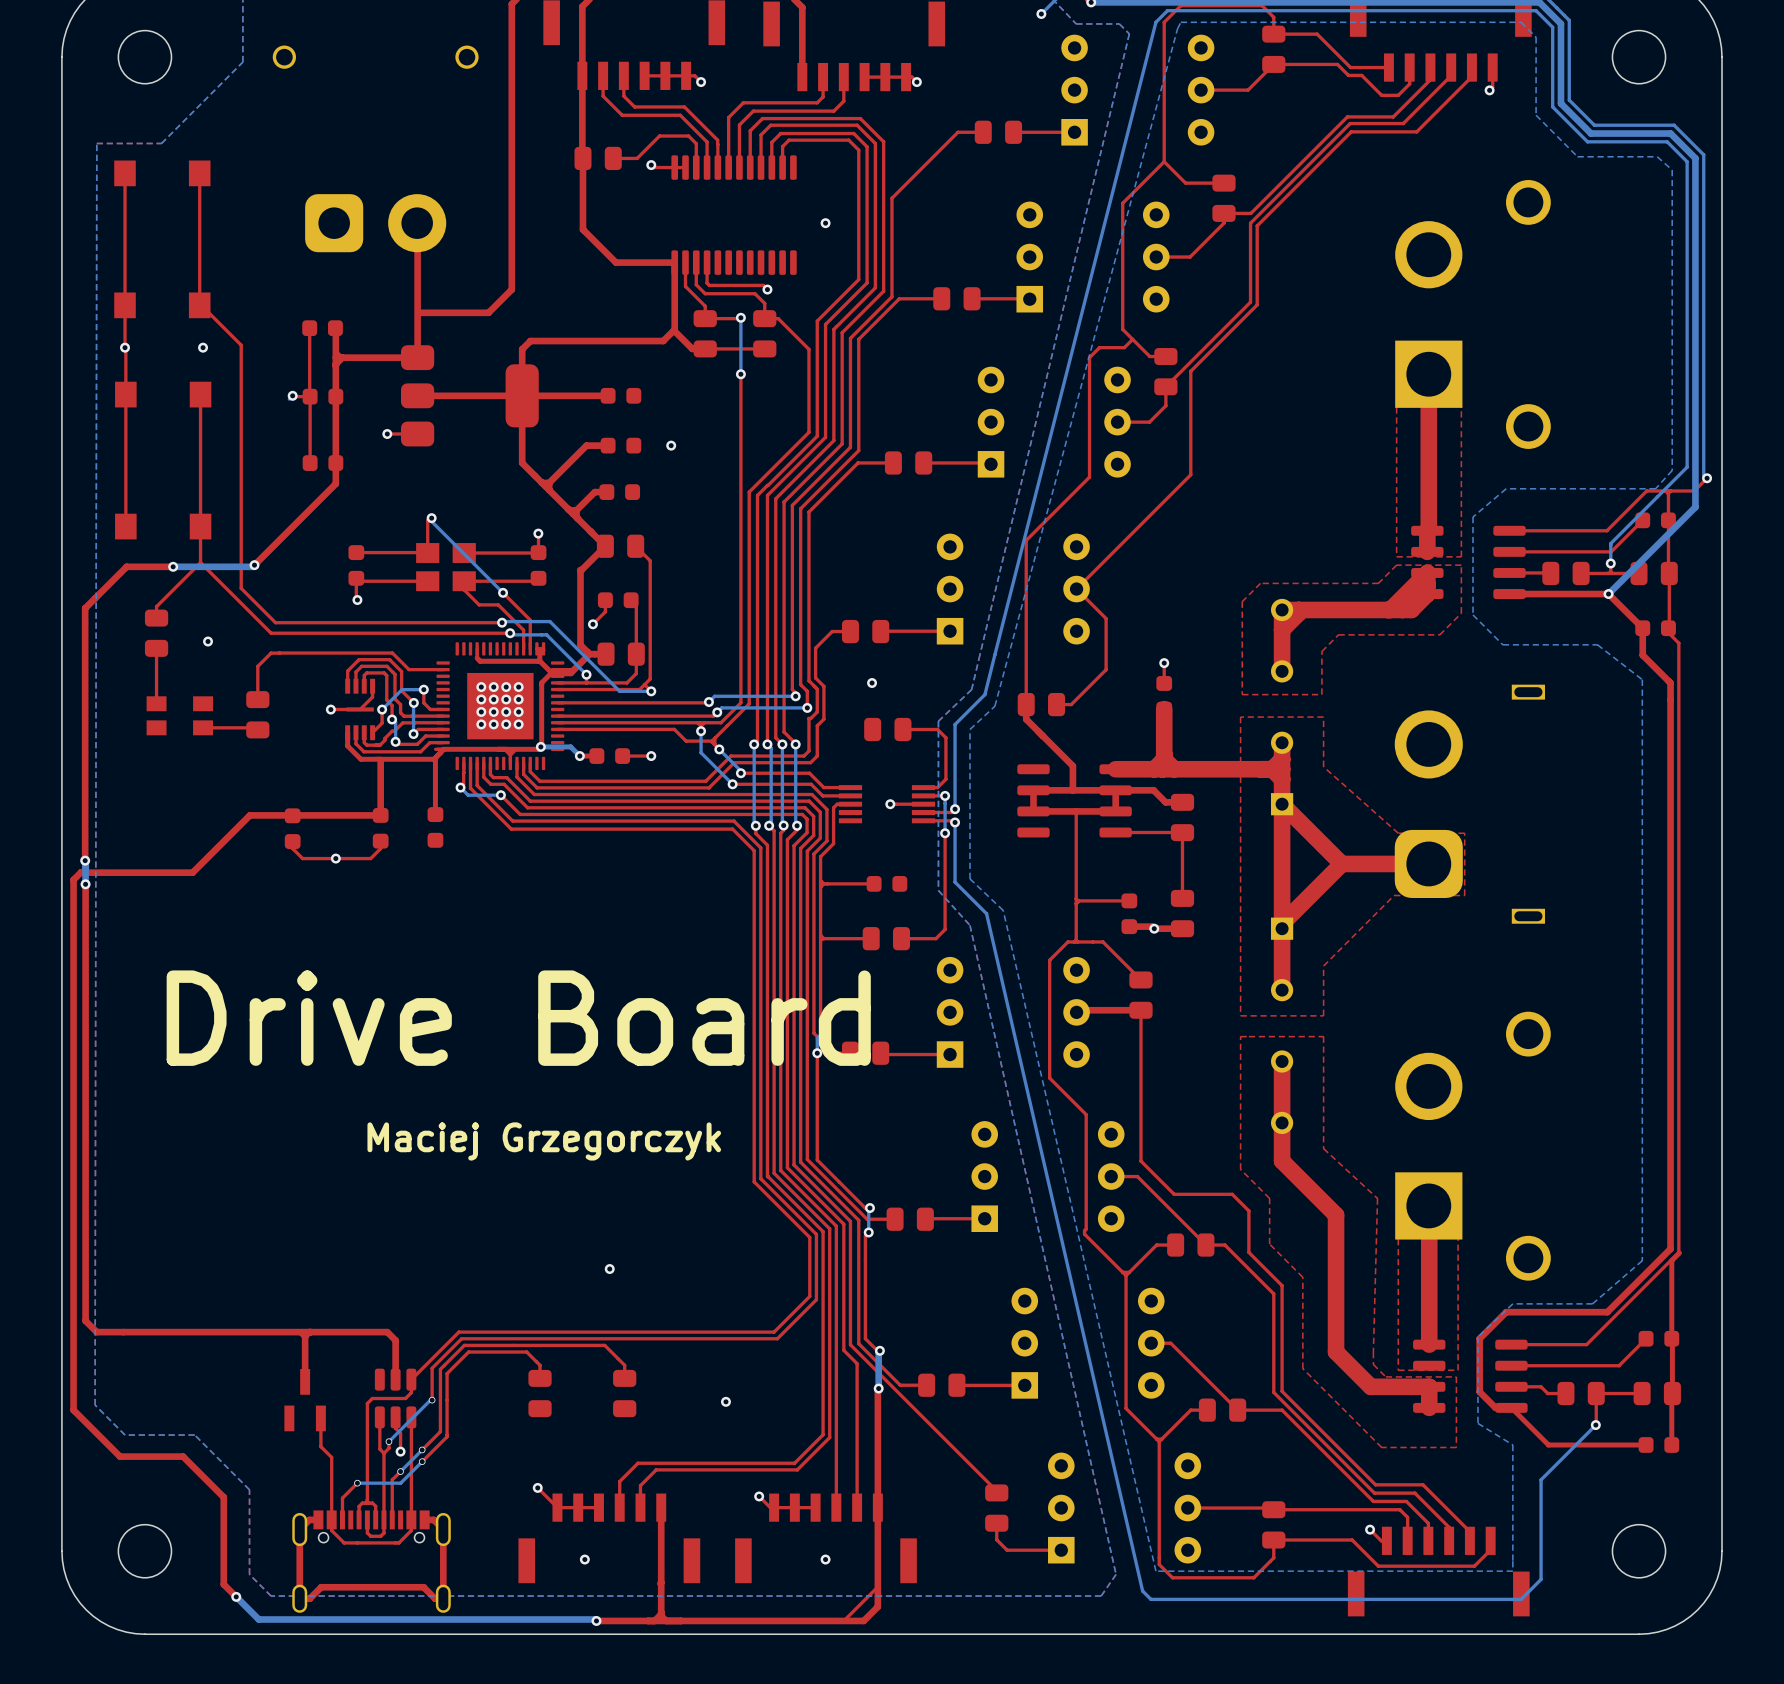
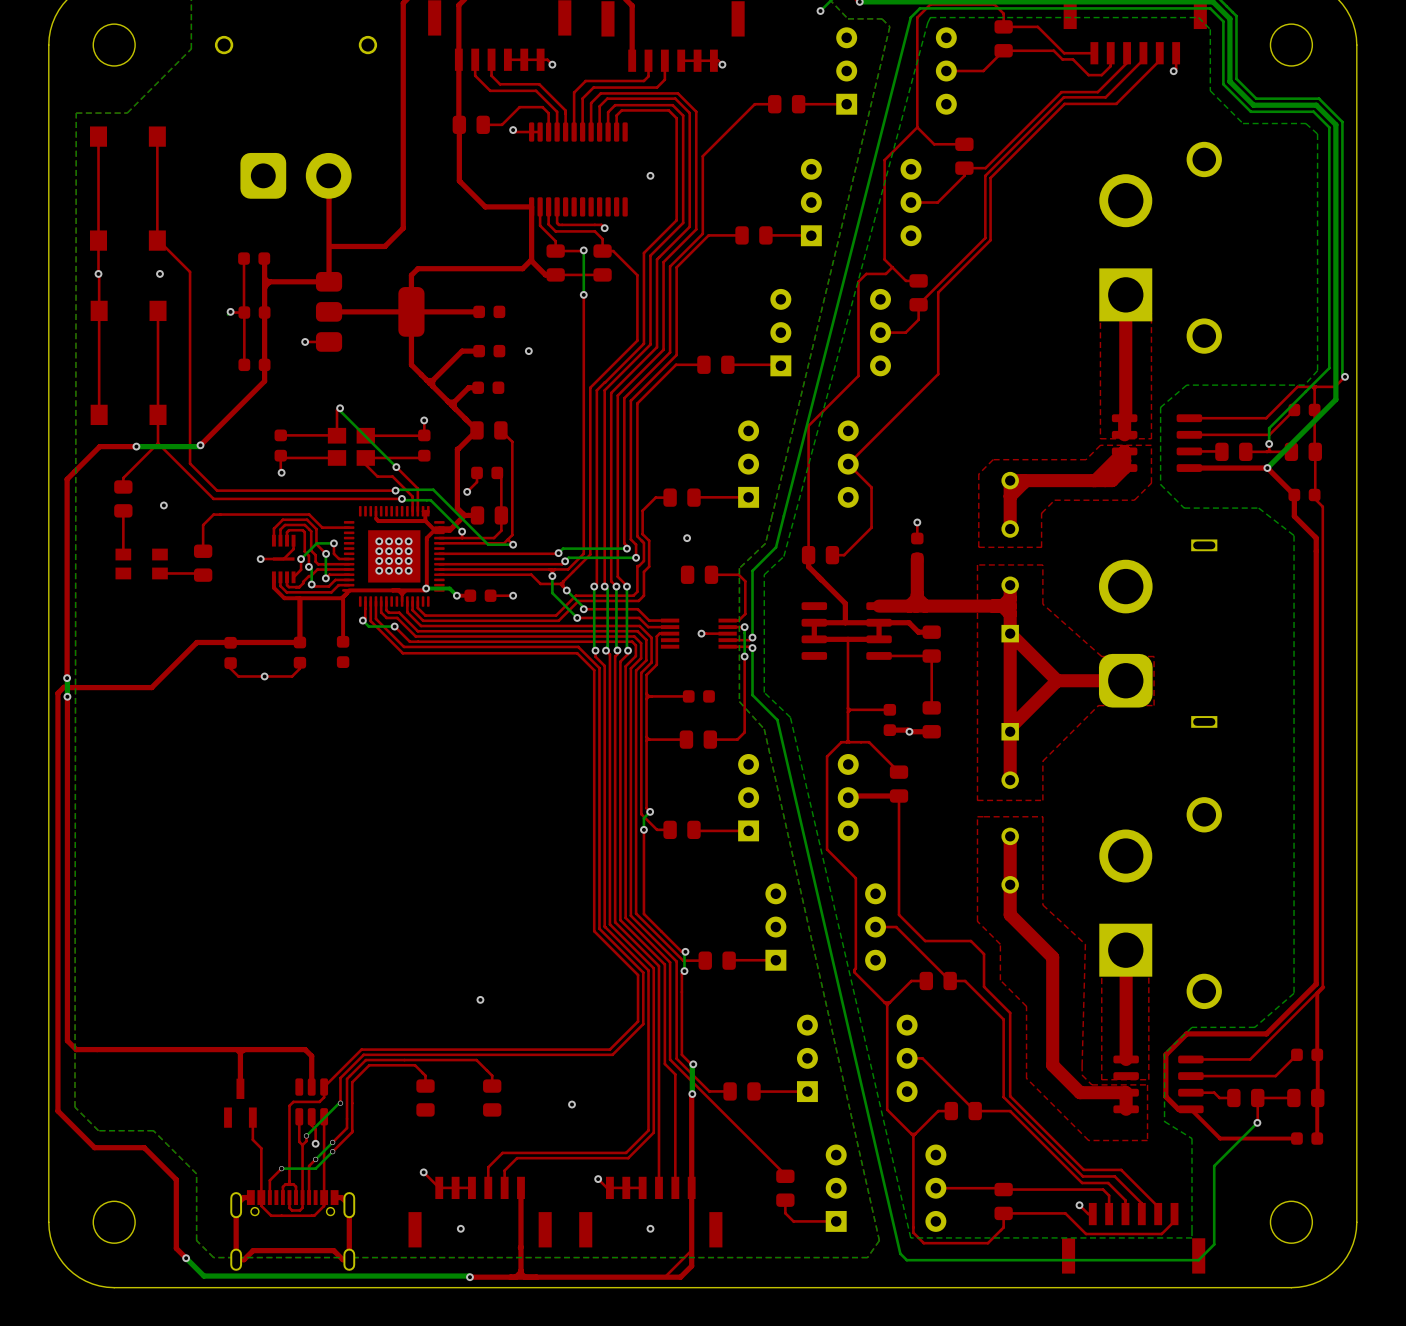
text: Drive Board (518, 1018) -> none
text: Maciej Grzegorczyk (544, 1141) -> none

